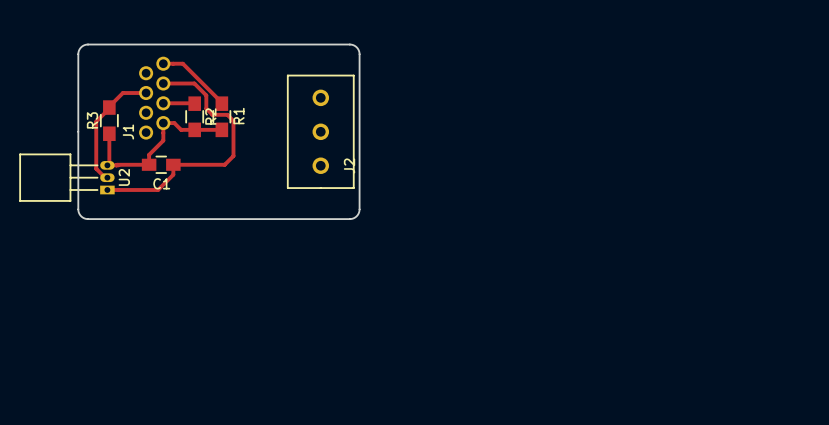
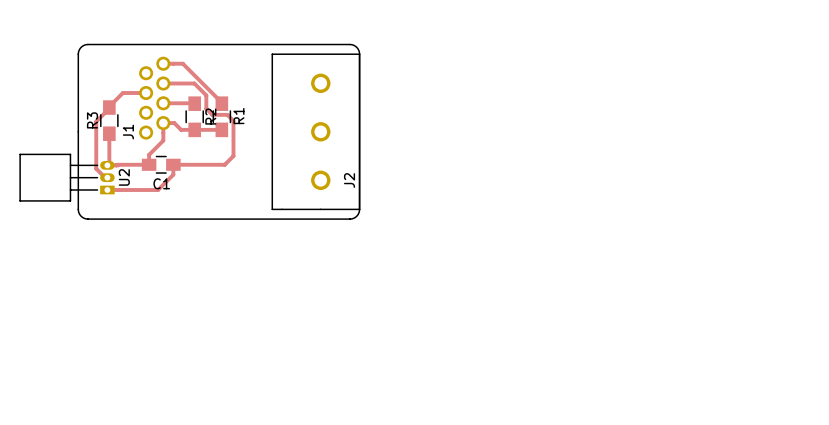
J2 footprint: [287, 74, 355, 189] -> [271, 53, 361, 211]

